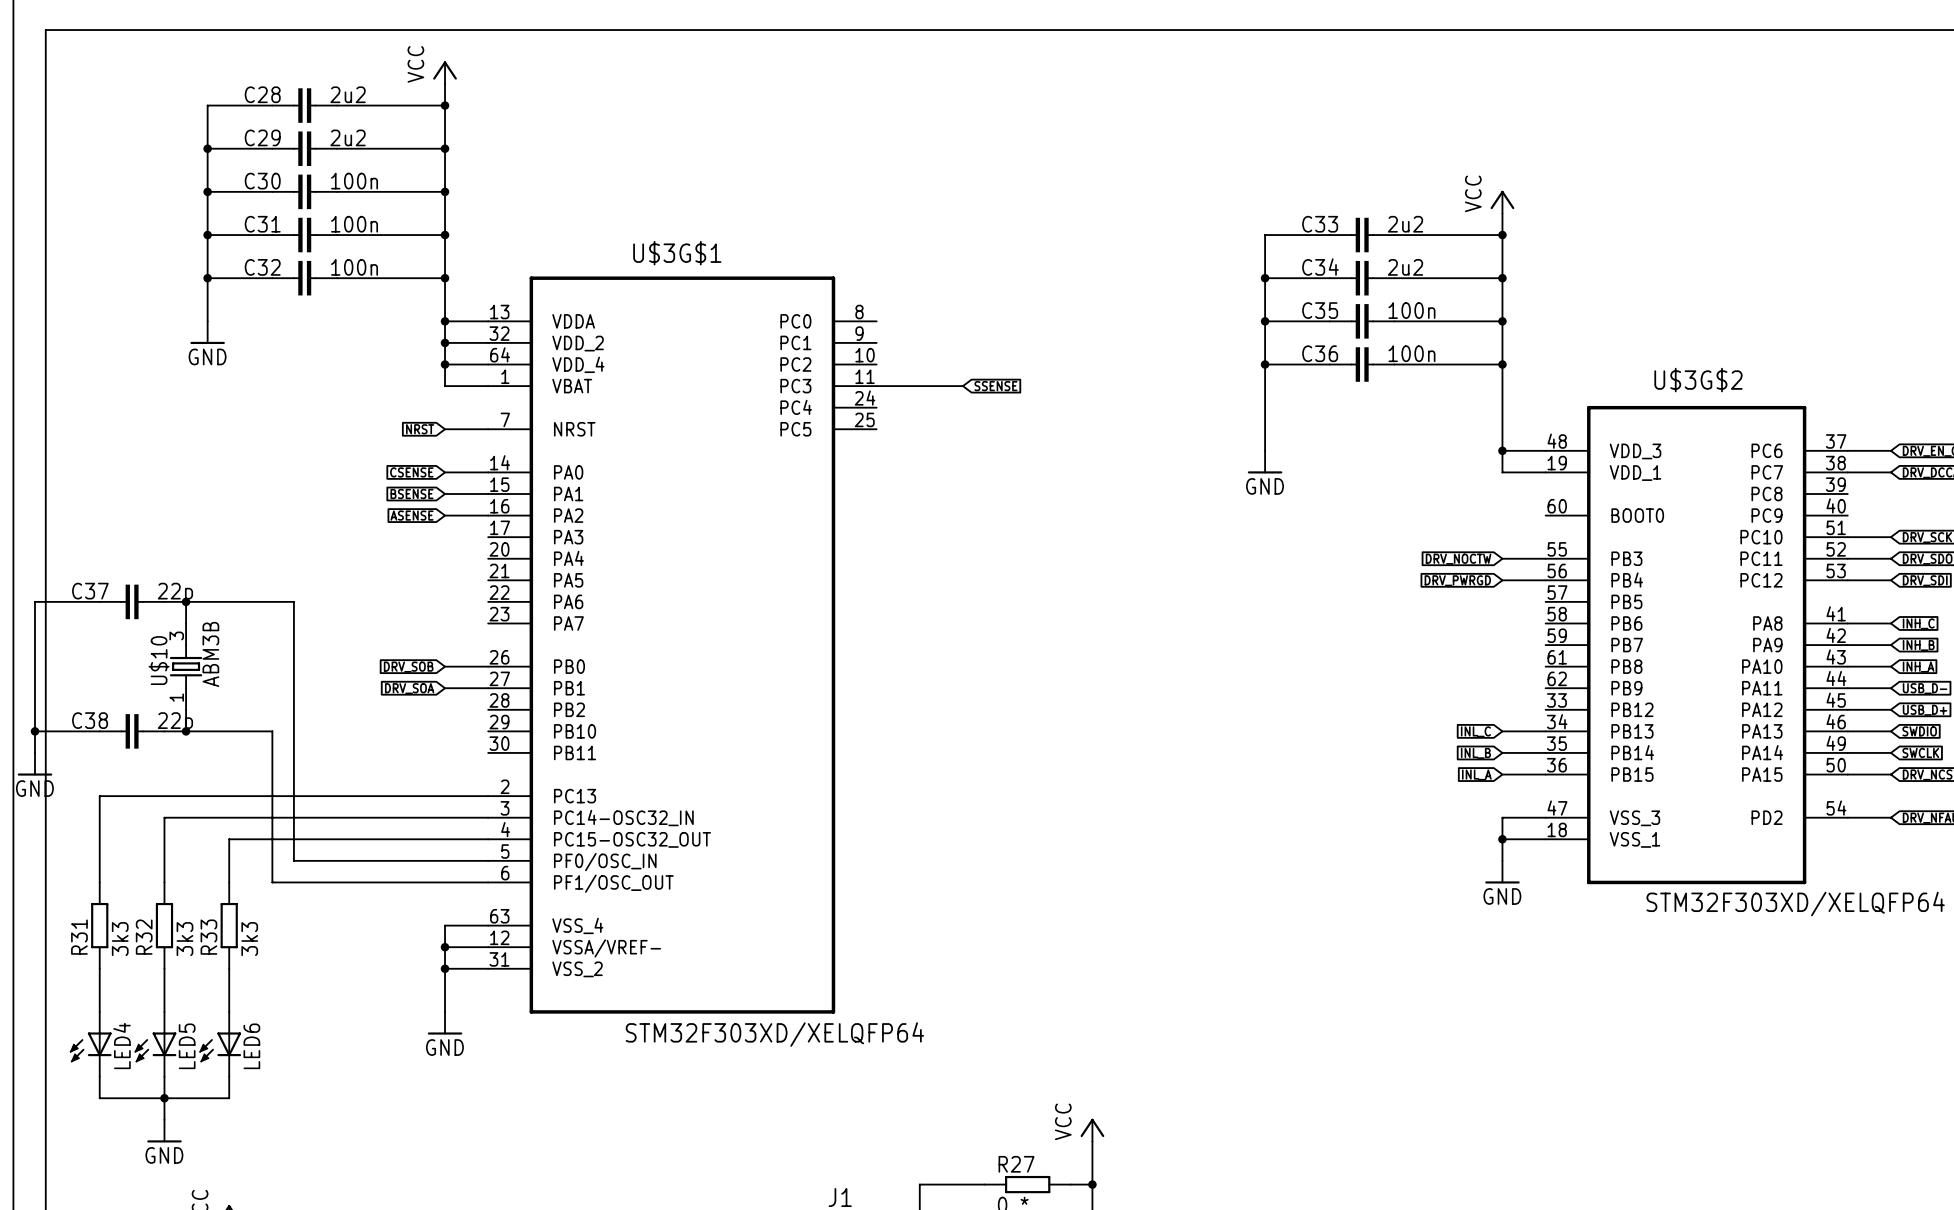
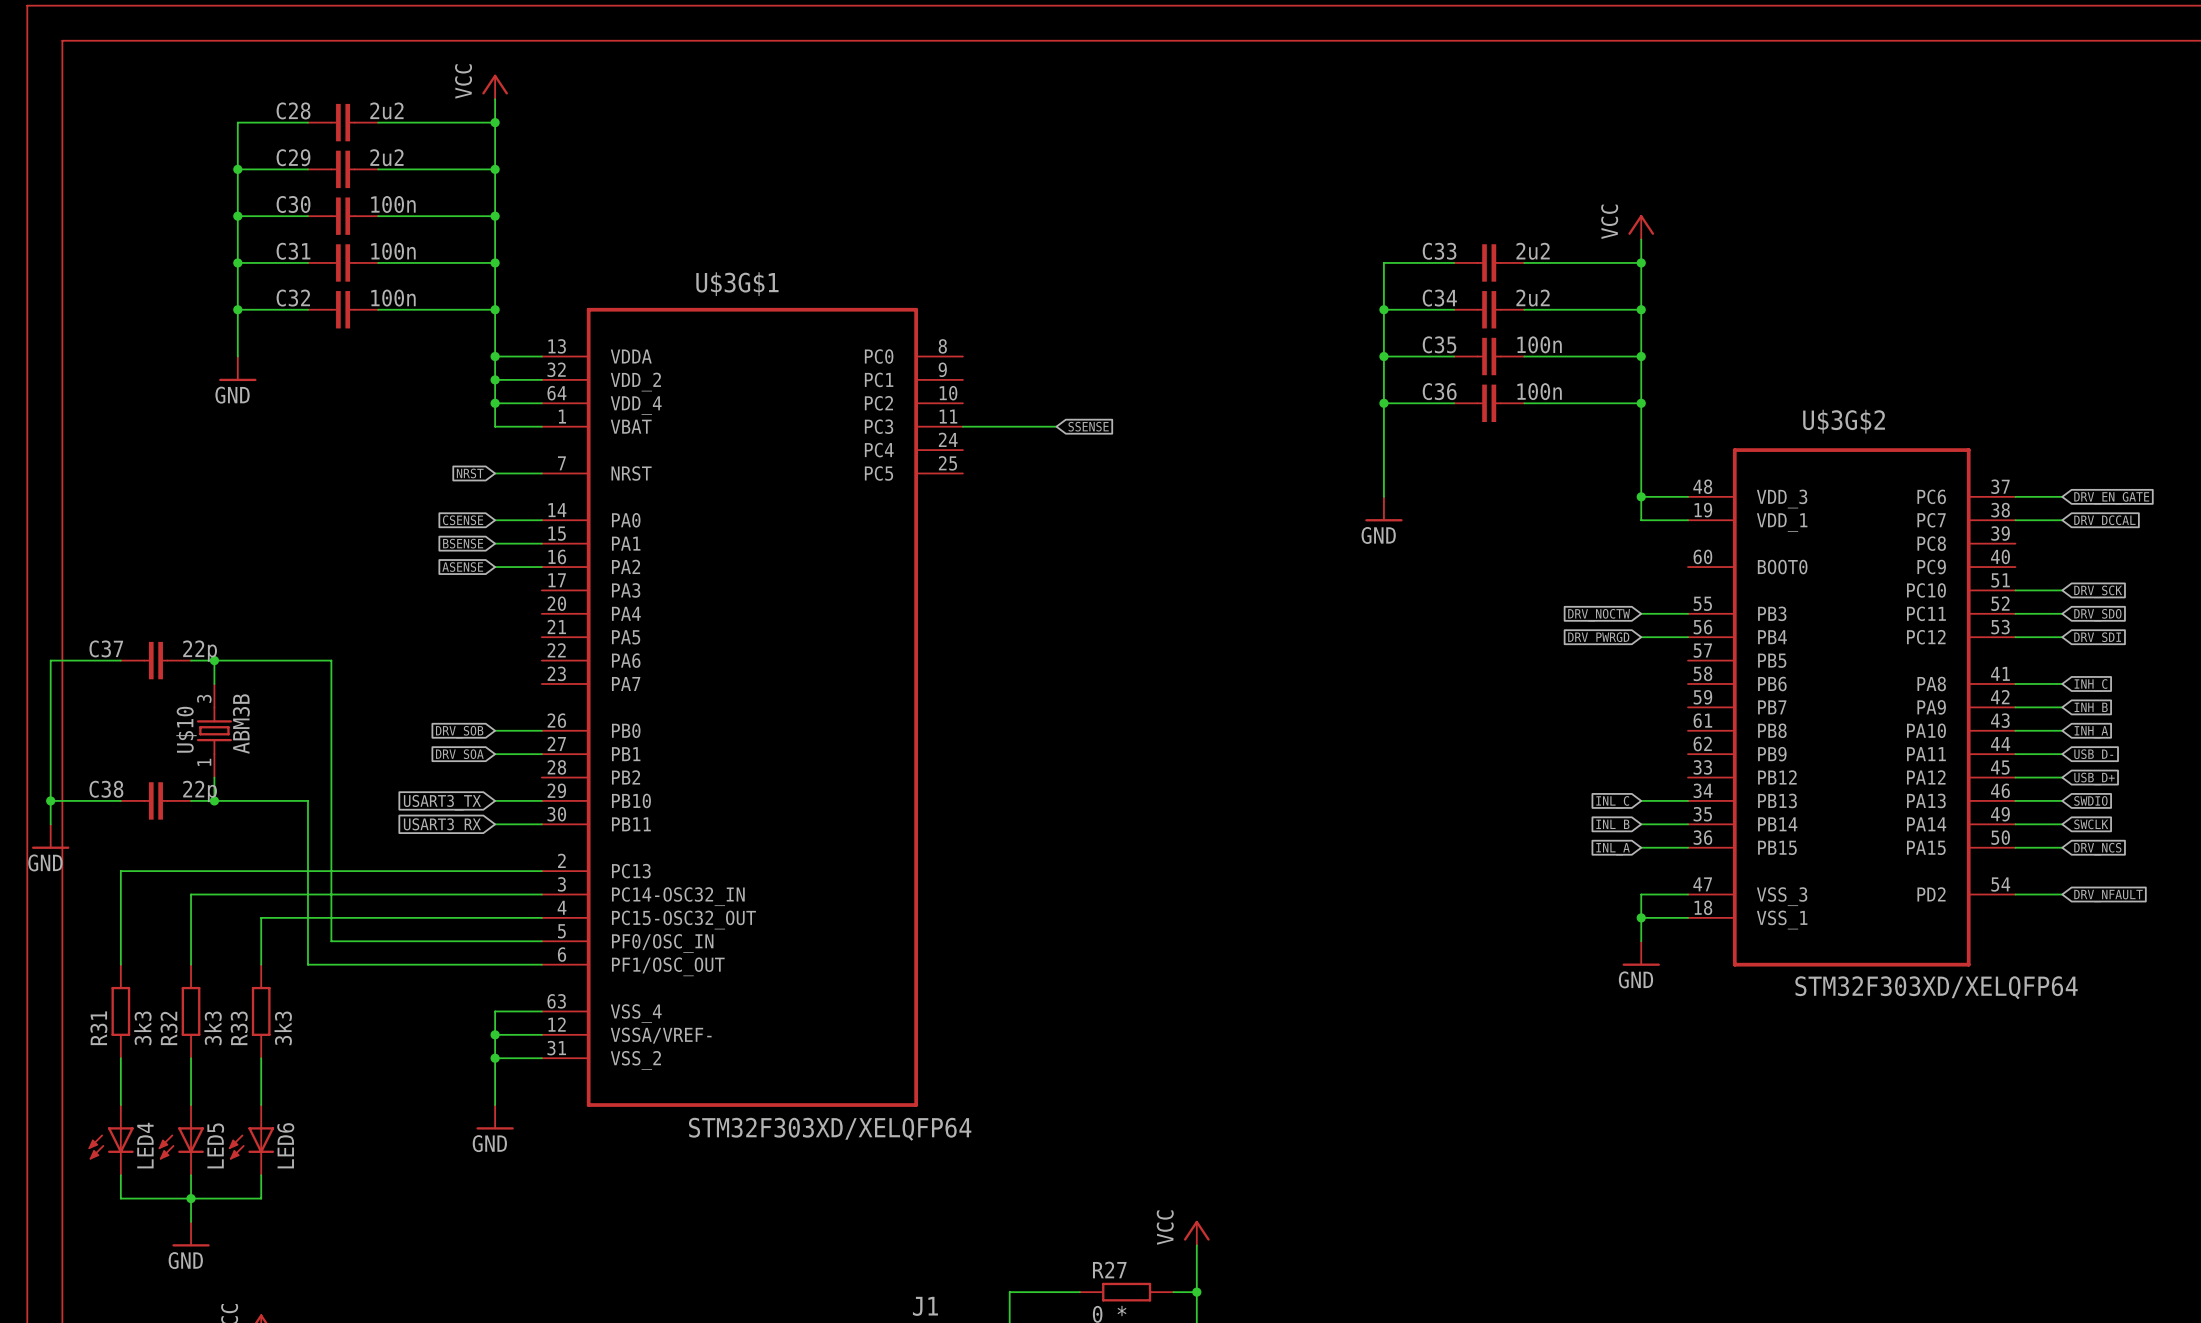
global label: none -> USART3_TX (442, 802)
wire: none -> (495, 800) (541, 800)
wire: none -> (495, 824) (541, 824)
global label: none -> USART3_RX (442, 826)

